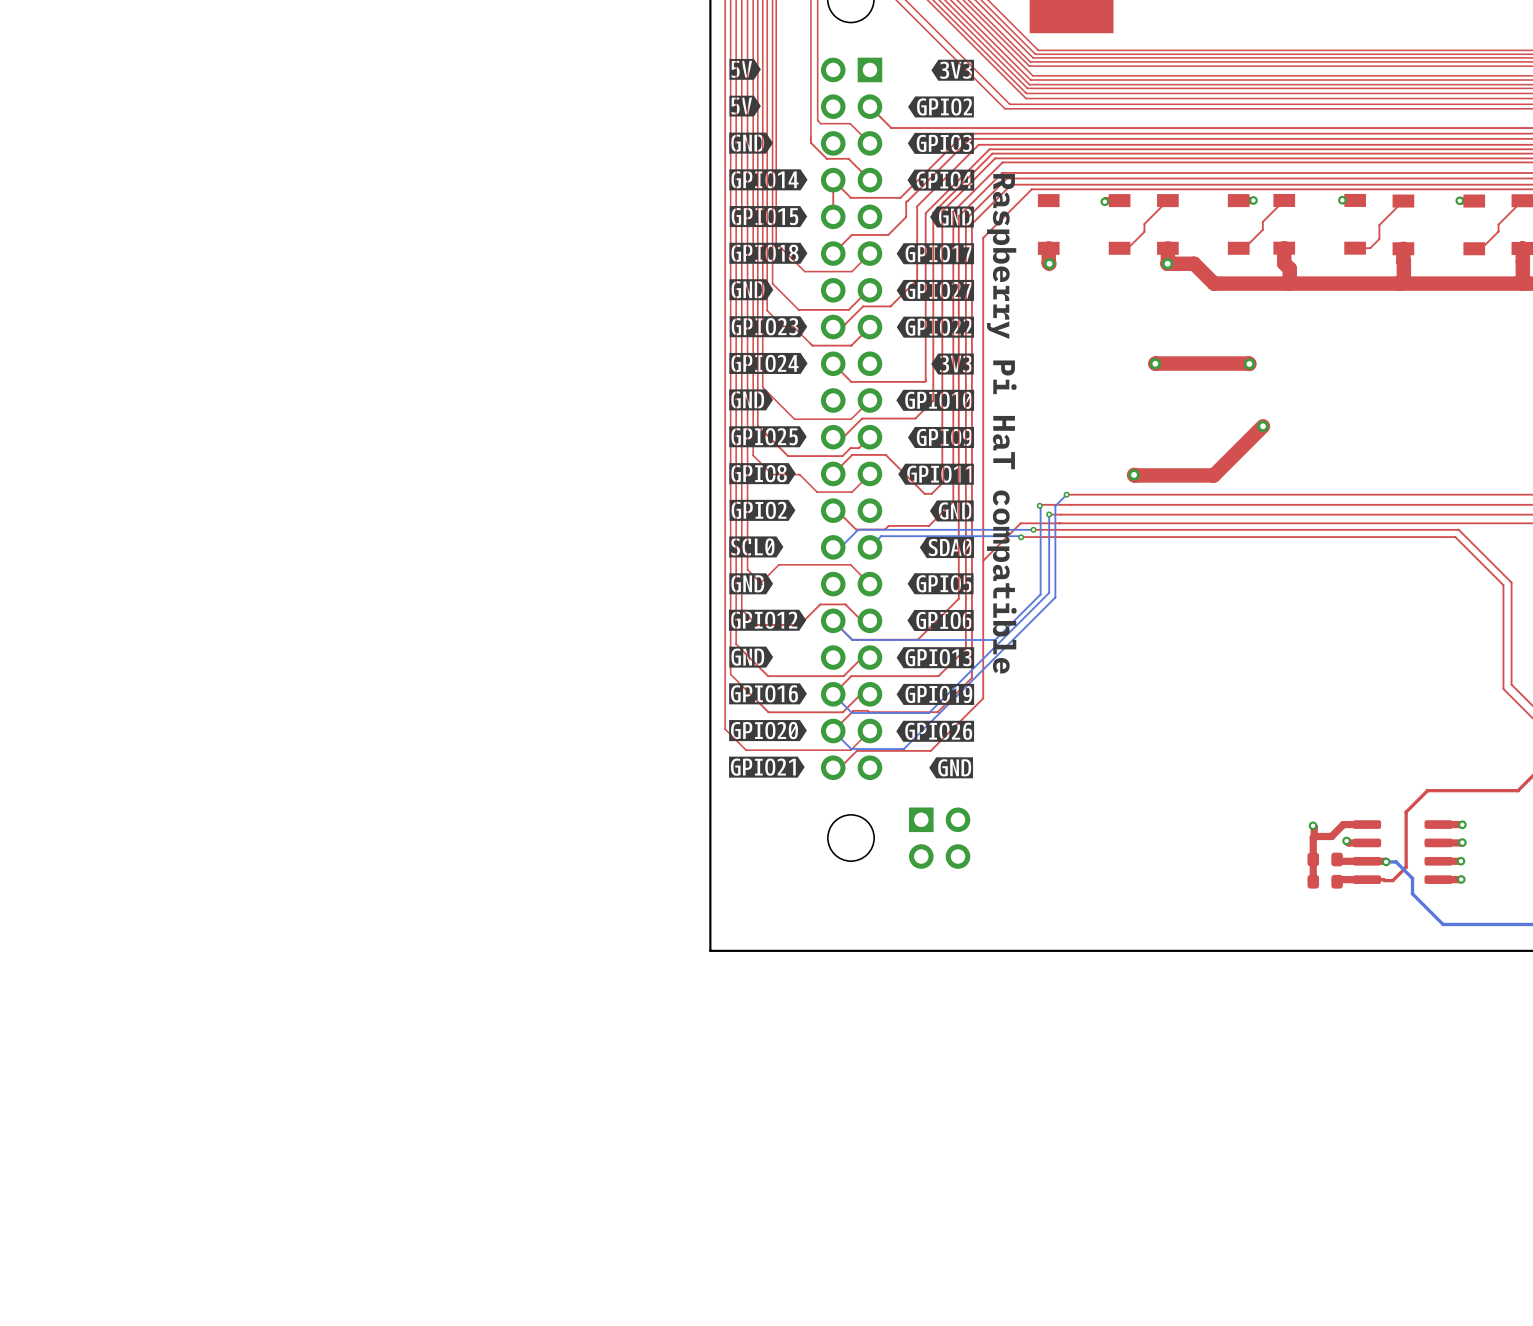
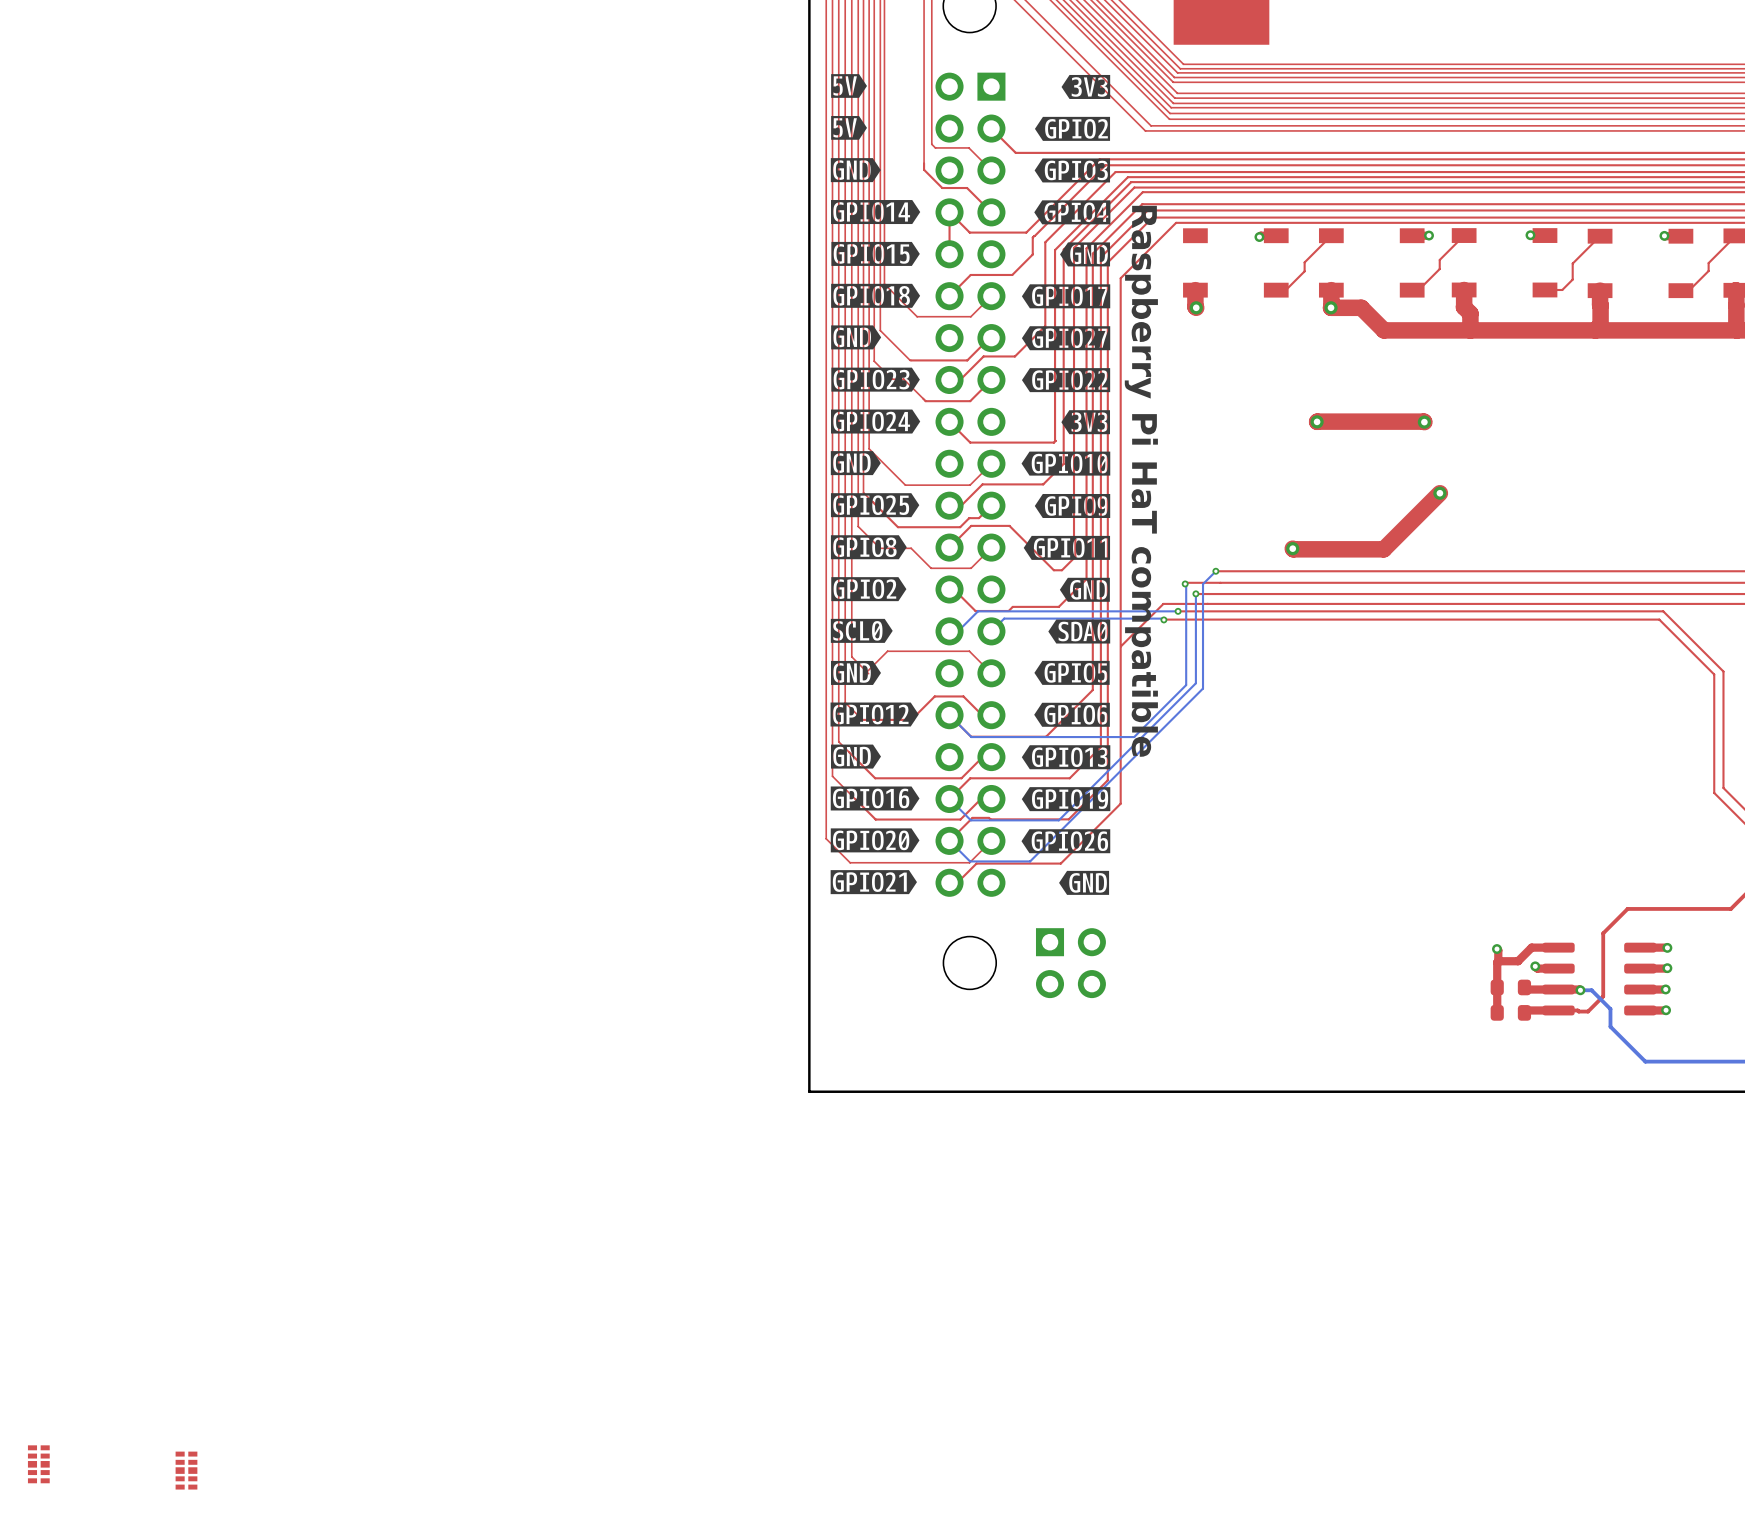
part: none -> (38, 1464)
part: none -> (186, 1470)

